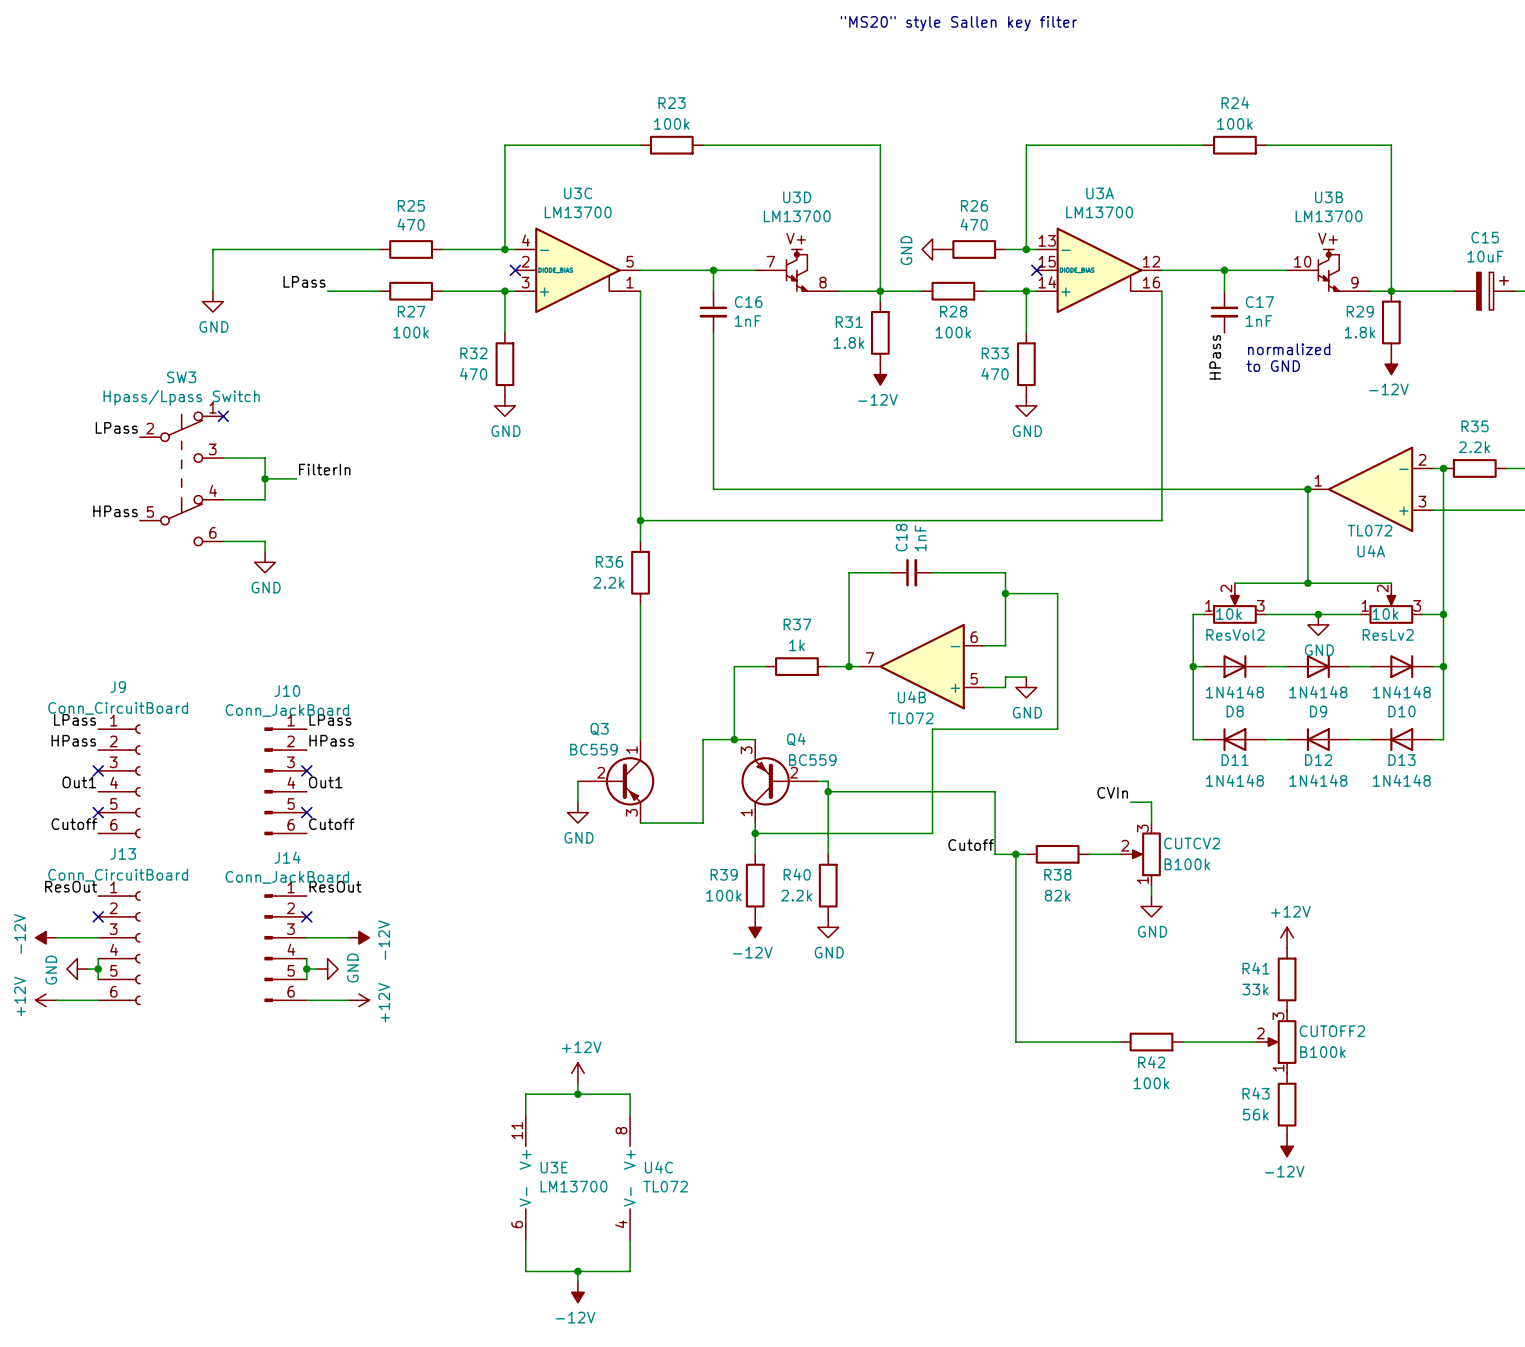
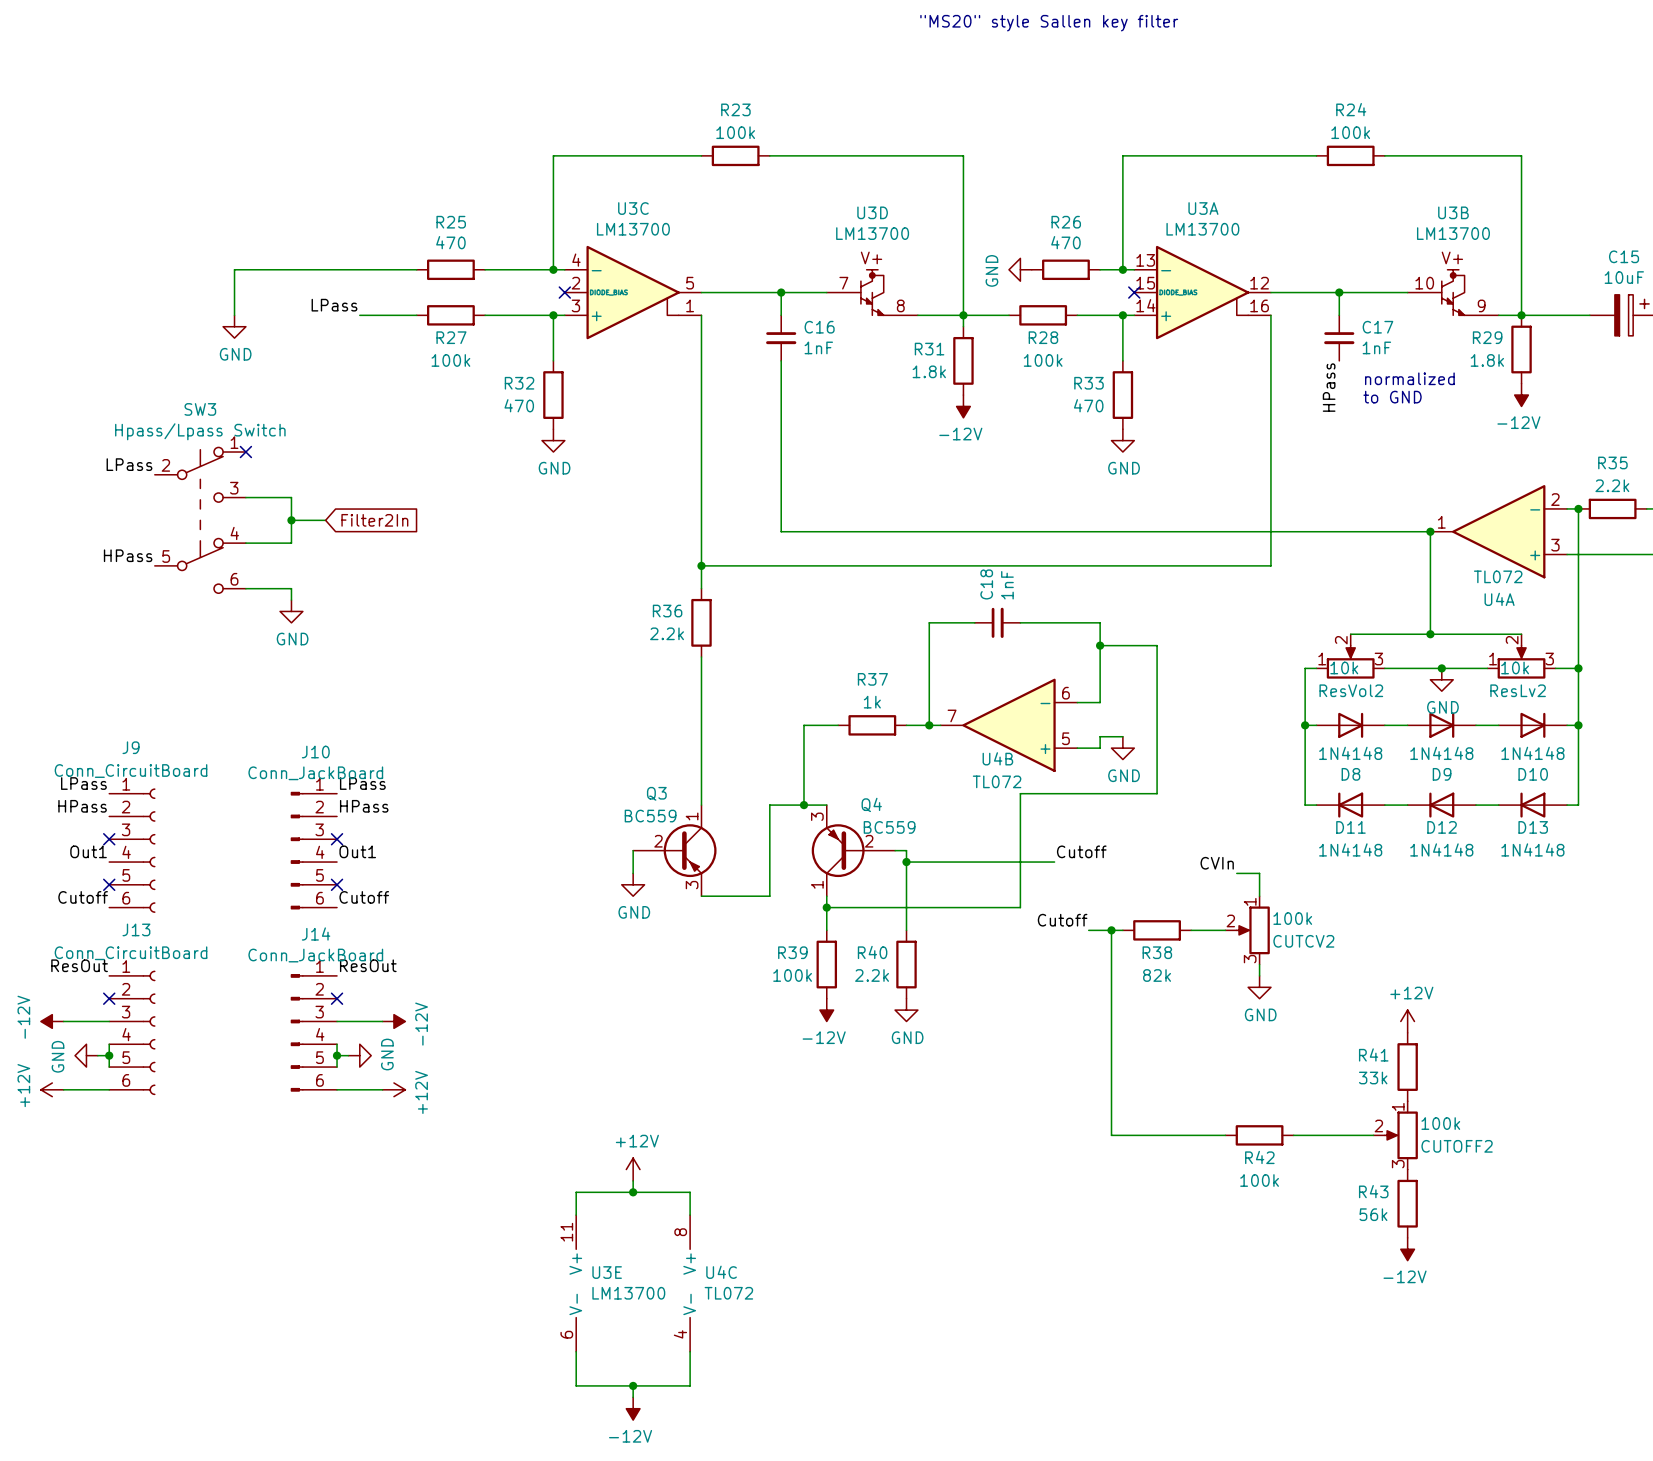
label: FilterIn (324, 469) -> none
global label: none -> Filter2In (374, 520)
label: none -> Cutoff (1081, 851)
wire: (963, 791) (995, 791) (995, 854) -> none
CUTCV2 flip: as is (1145, 854) -> up-down (1253, 930)
CUTCV2 value: B100k (1187, 864) -> 100k (1292, 918)
CUTOFF2 flip: as is (1281, 1042) -> up-down (1401, 1135)
CUTOFF2 value: B100k (1322, 1052) -> 100k (1440, 1123)

